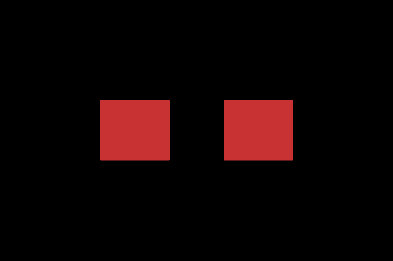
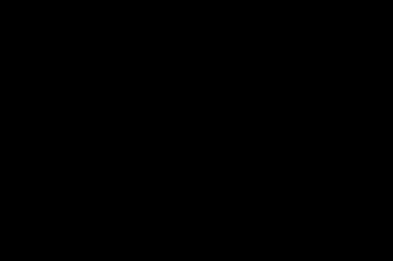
part: (196, 130) -> none

